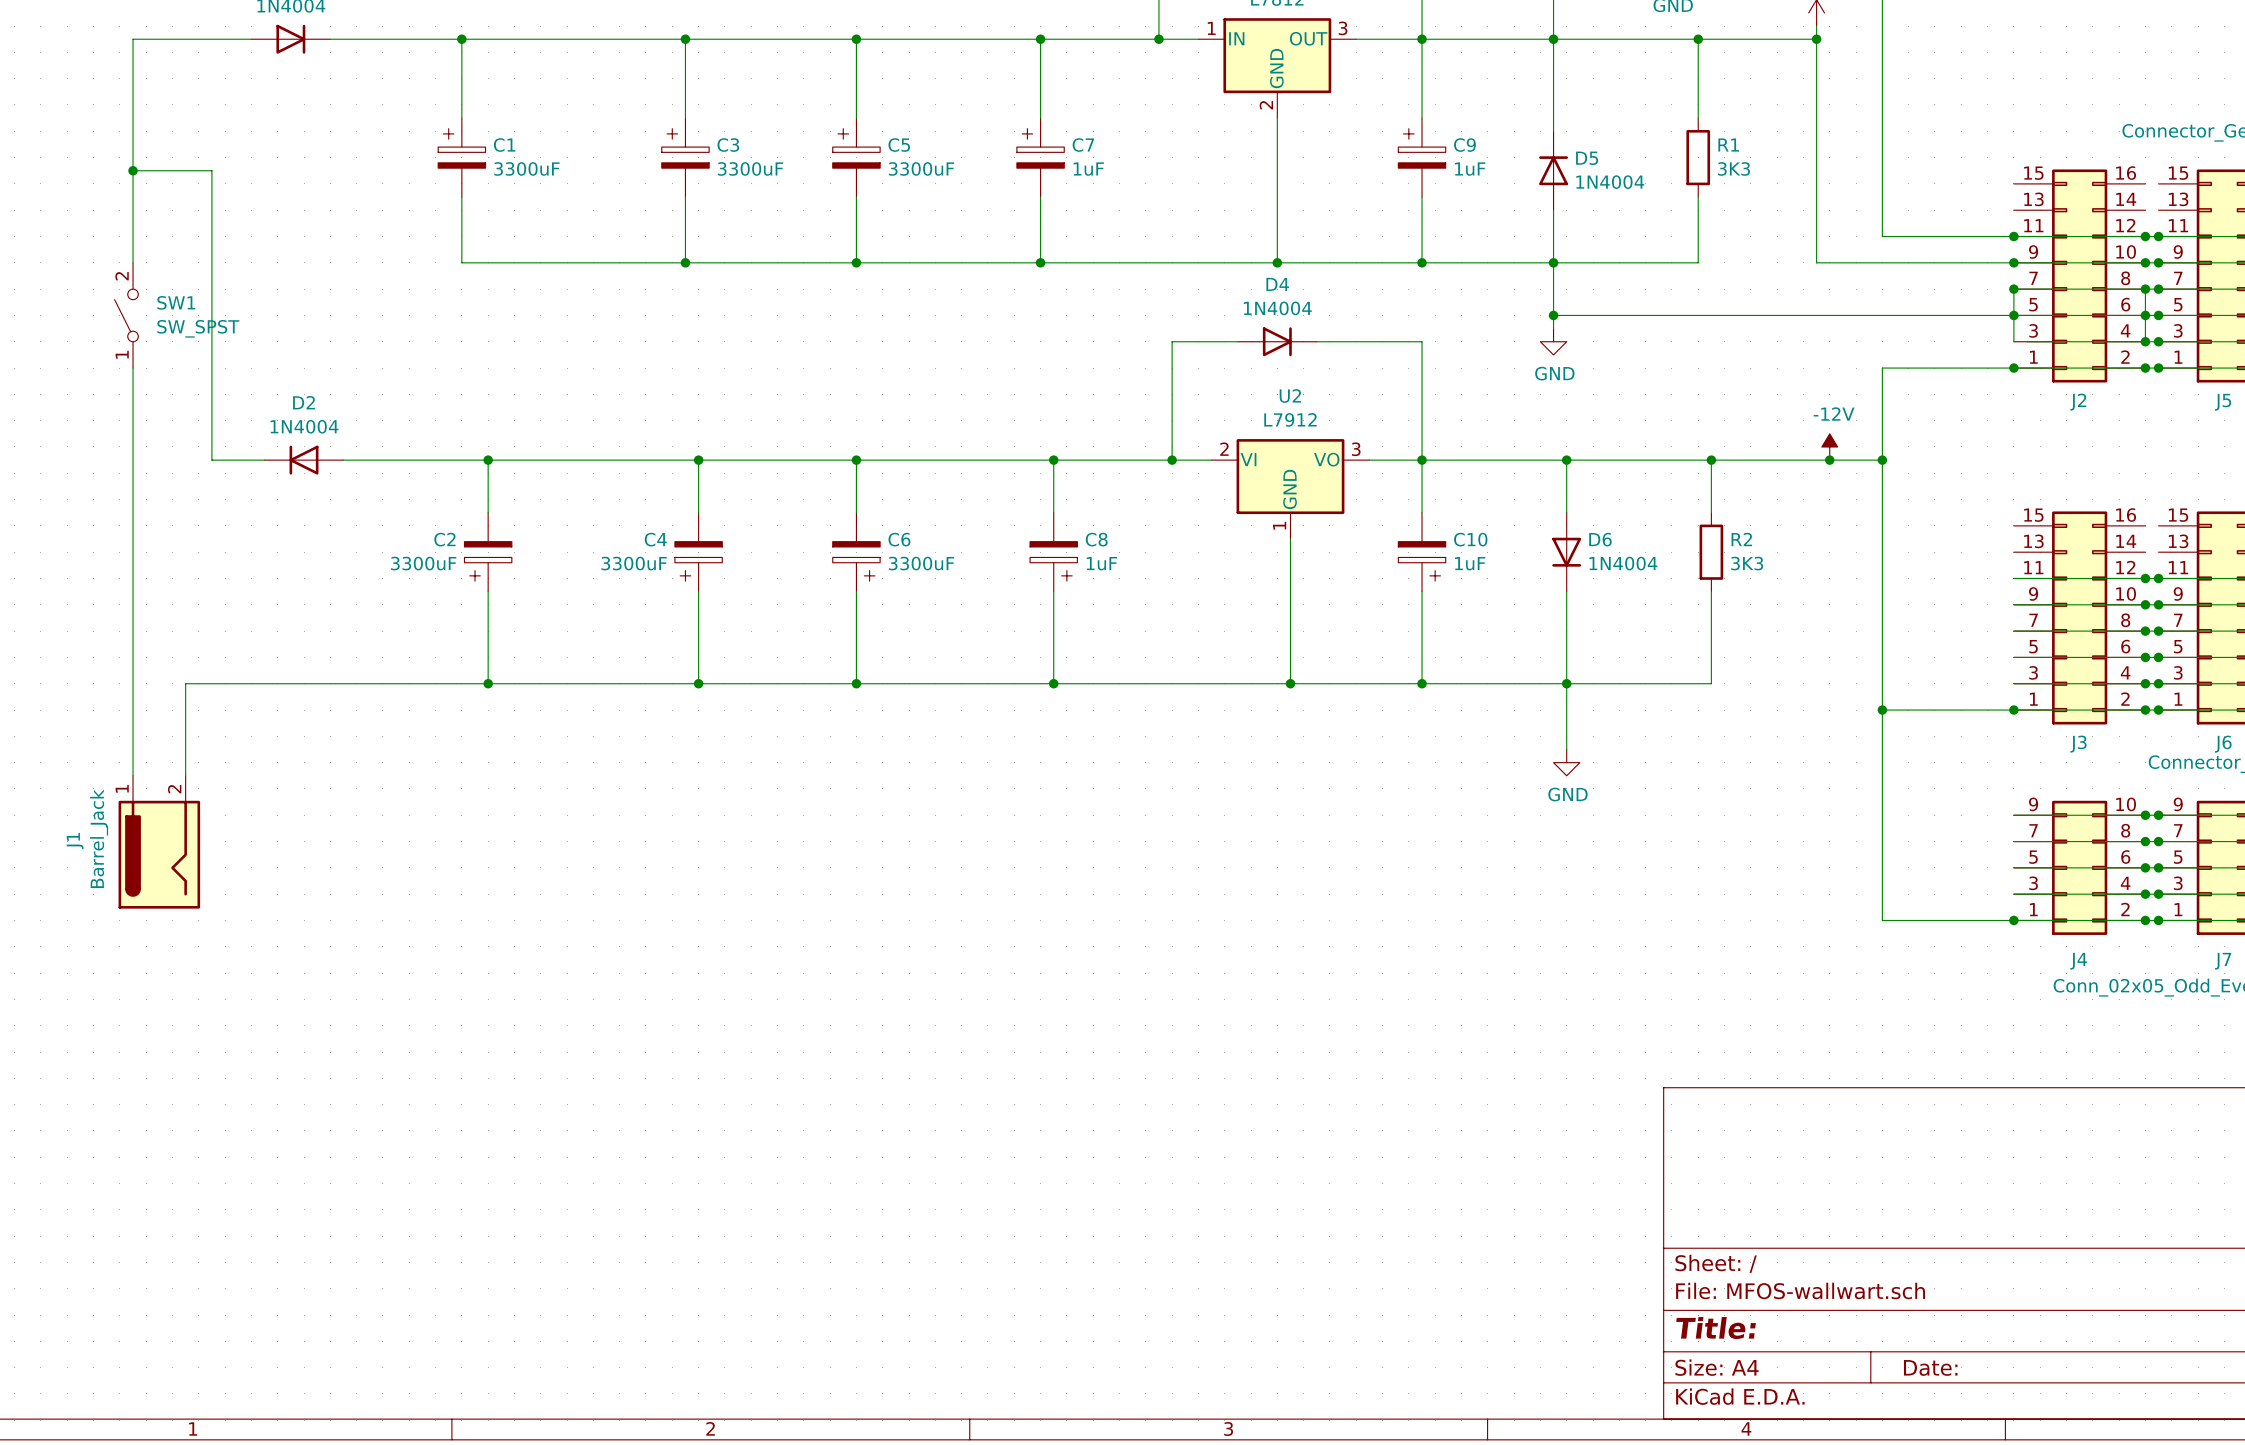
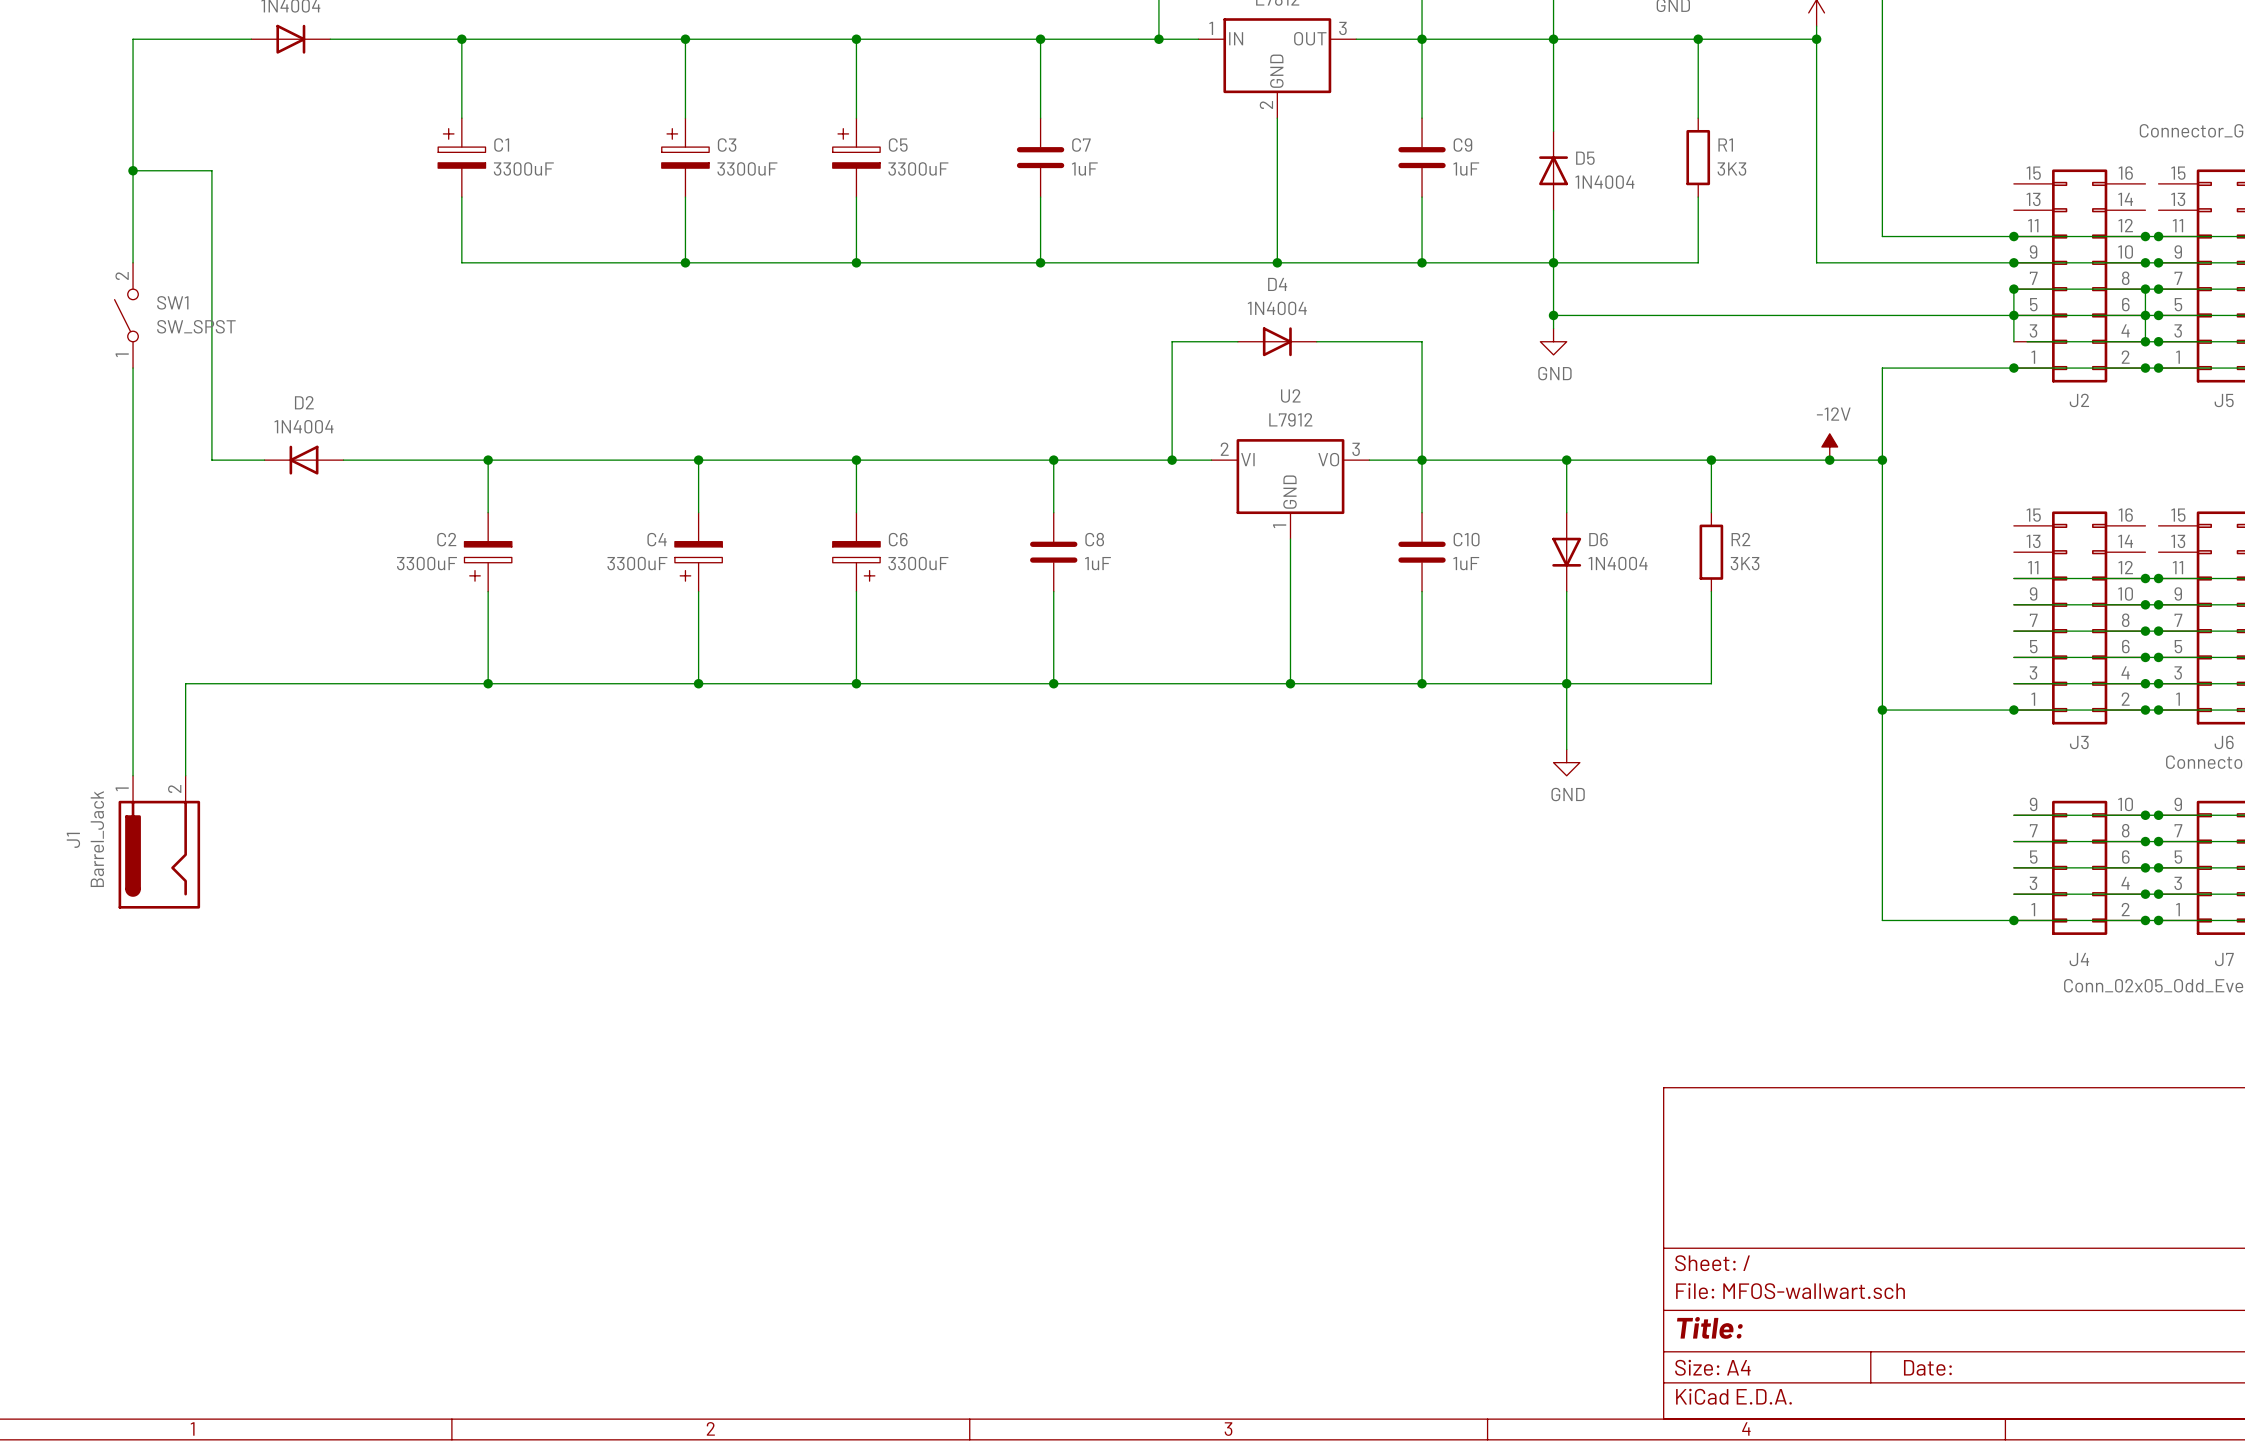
C7 symbol: [1016, 118, 1065, 198] -> [1016, 118, 1065, 198]
C9 symbol: [1398, 118, 1446, 198] -> [1398, 118, 1446, 198]
C8 symbol: [1030, 512, 1078, 592] -> [1030, 512, 1078, 592]
C10 symbol: [1398, 512, 1446, 592] -> [1398, 512, 1446, 592]

